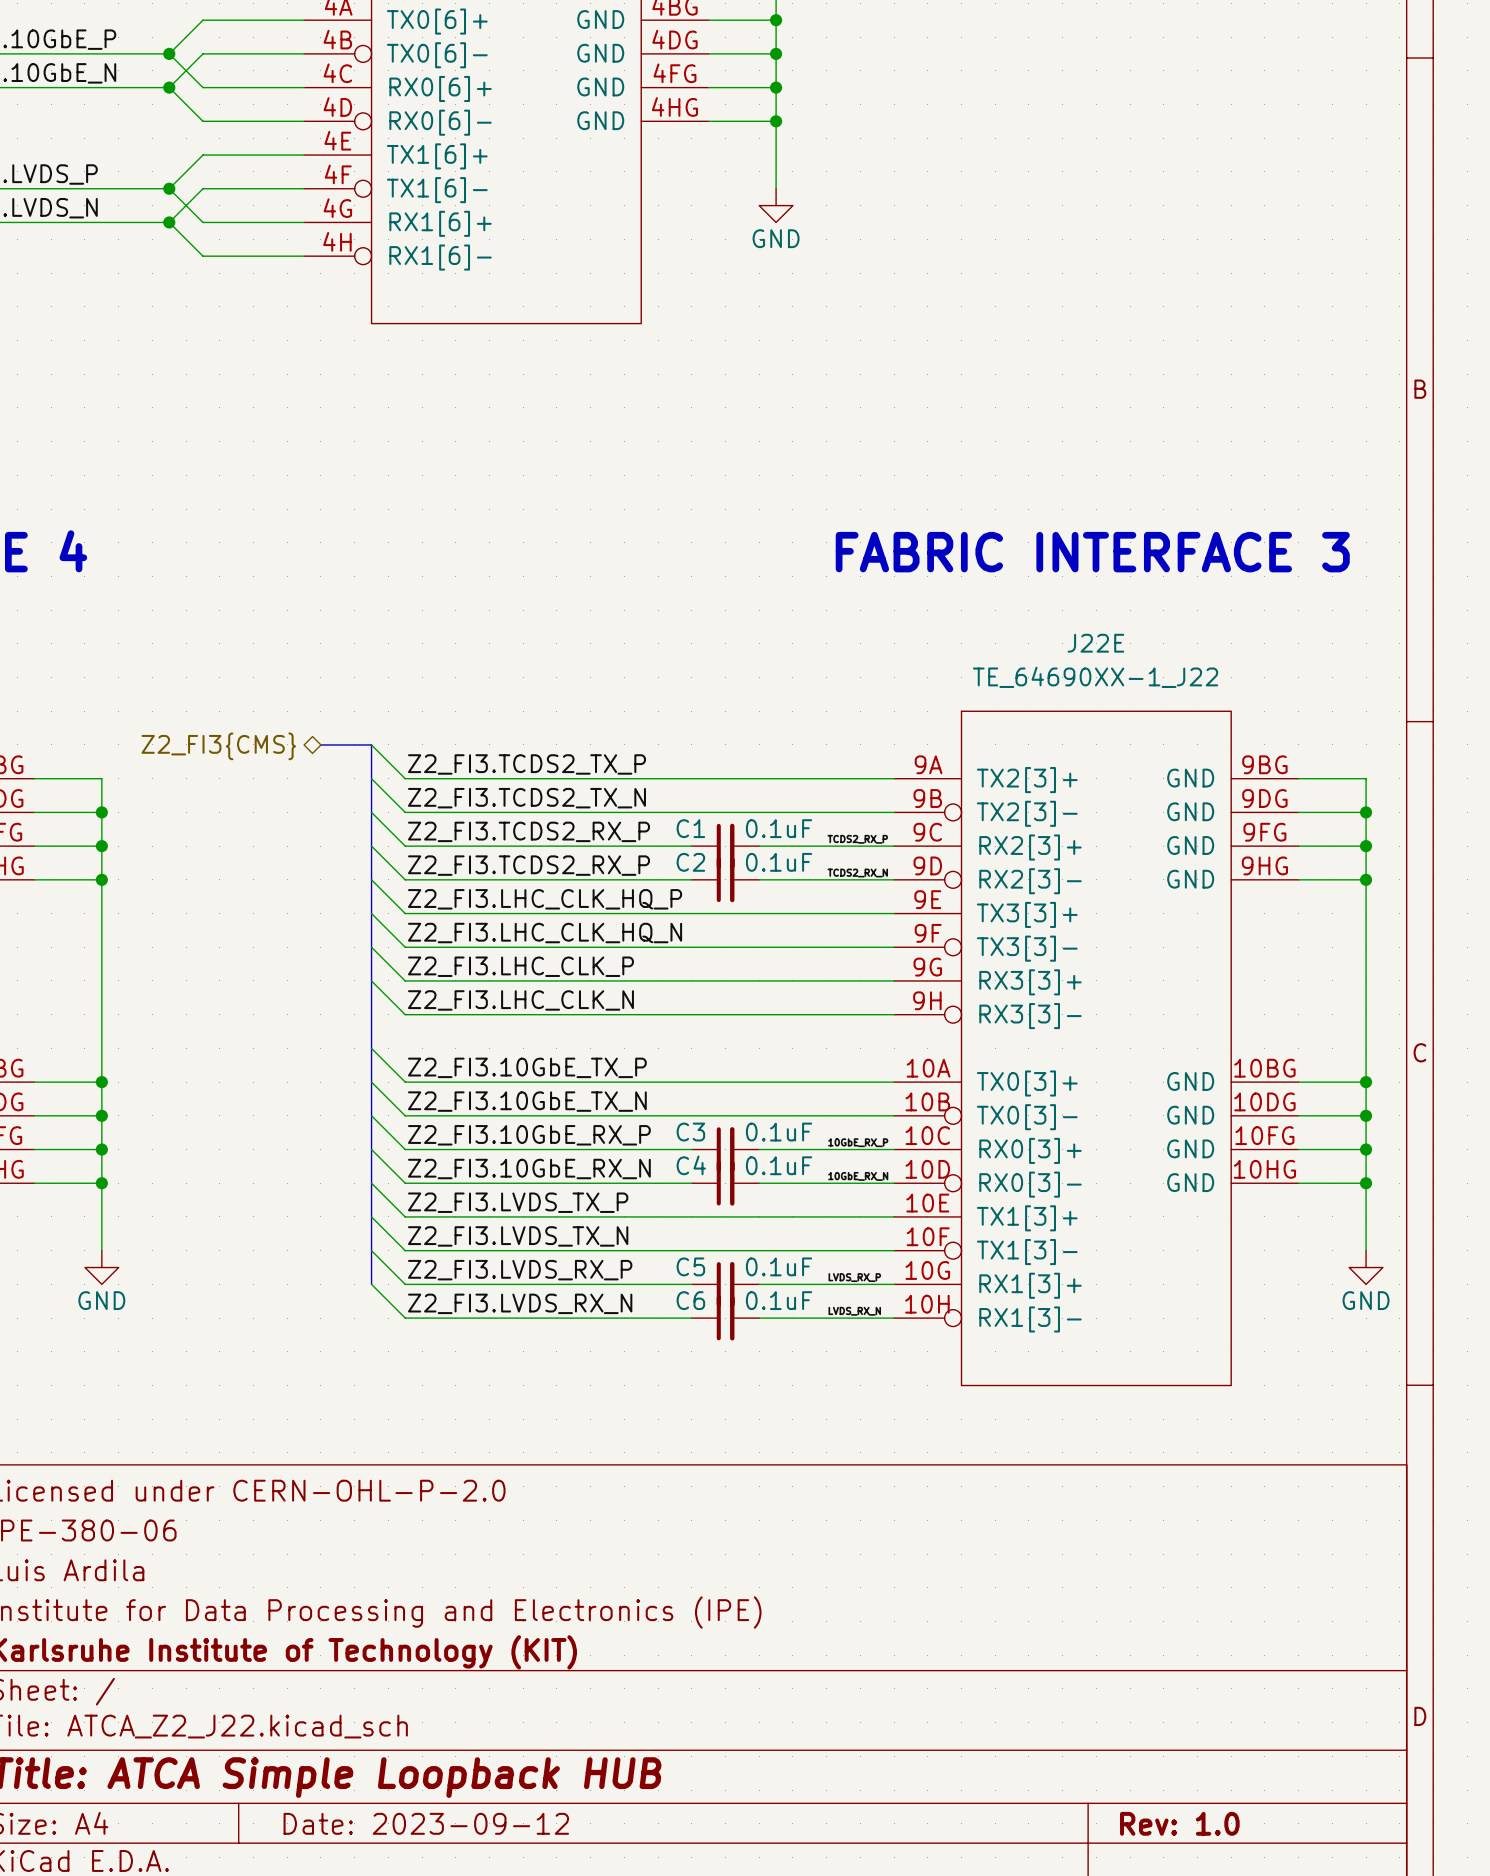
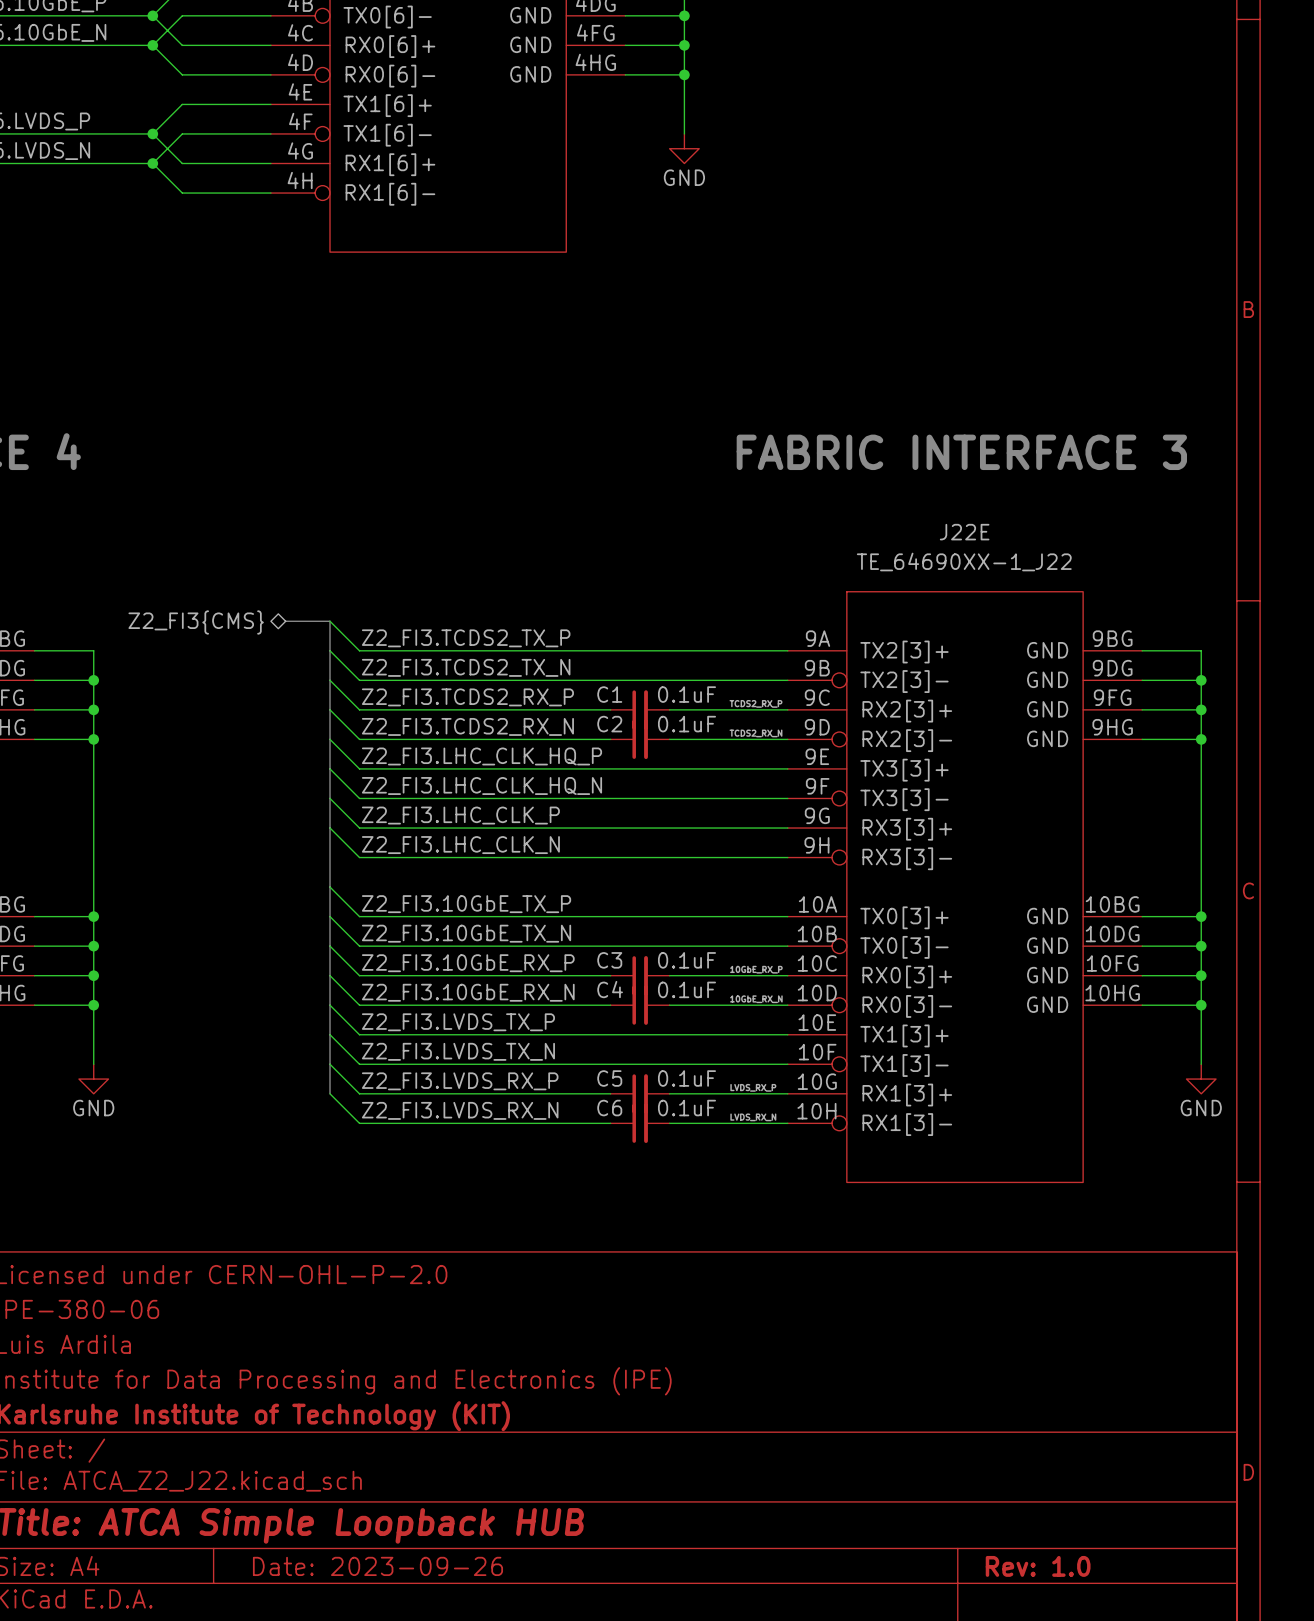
label: Z2_FI3.TCDS2_RX_P (528, 865) -> Z2_FI3.TCDS2_RX_N (467, 726)
title block: Date: 2023-09-12 (426, 1823) -> Date: 2023-09-26 (377, 1566)

